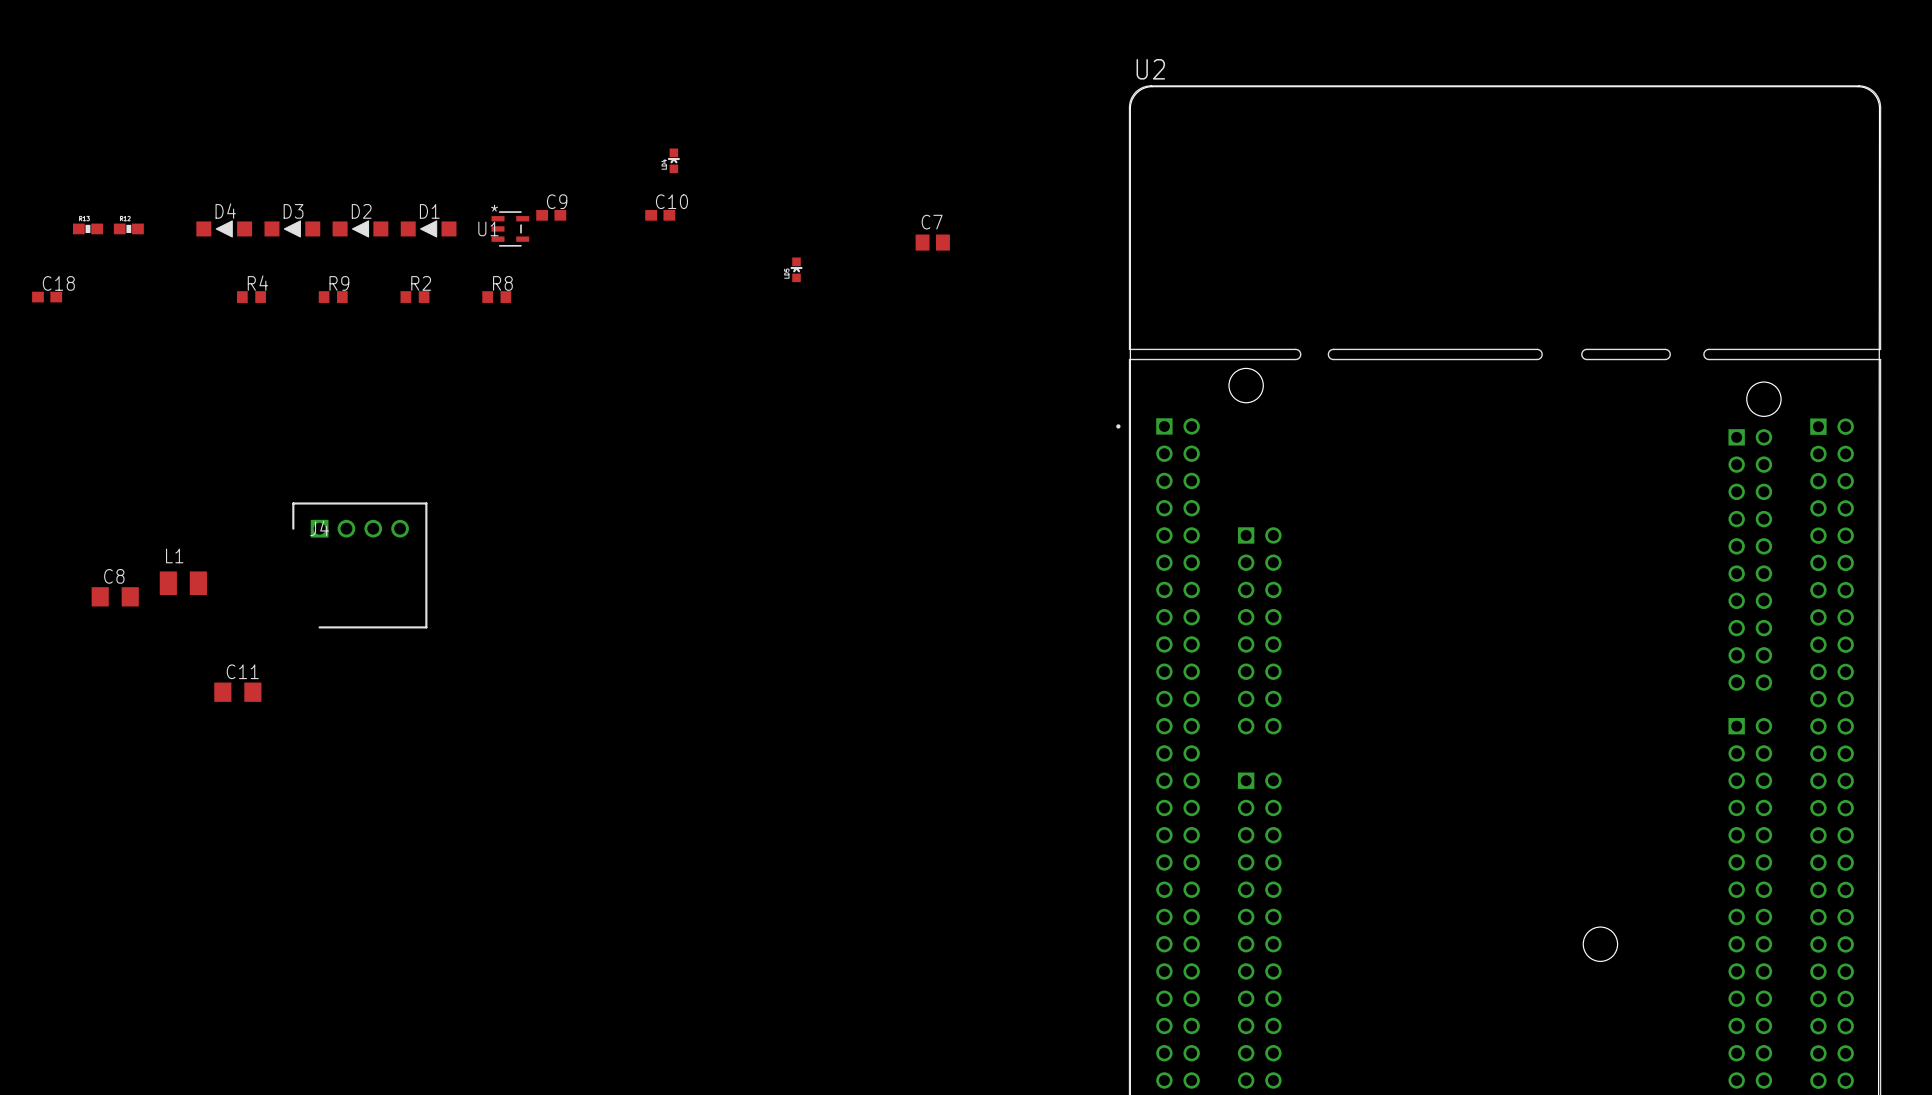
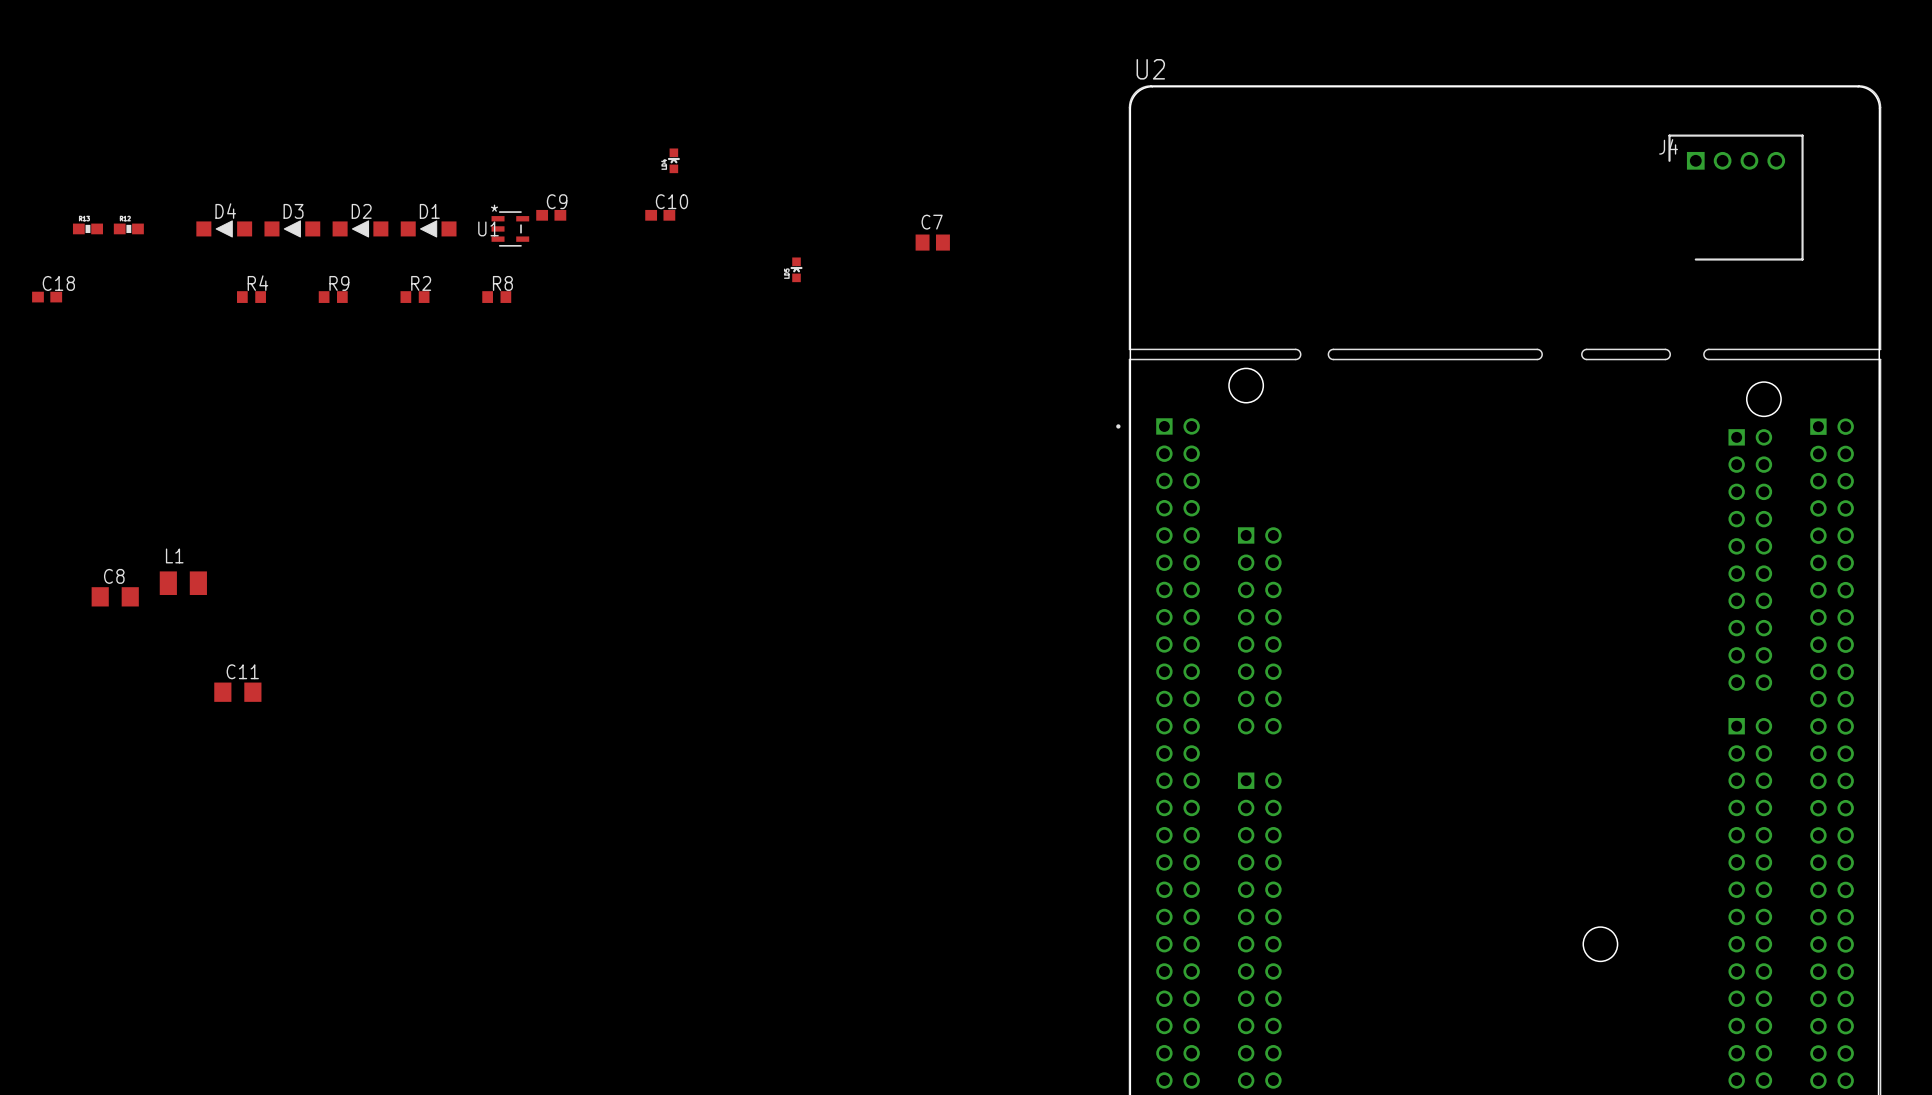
J4 name position: J4 (319, 528) -> J4 (1668, 146)
J4 position: (359, 565) -> (1736, 197)

